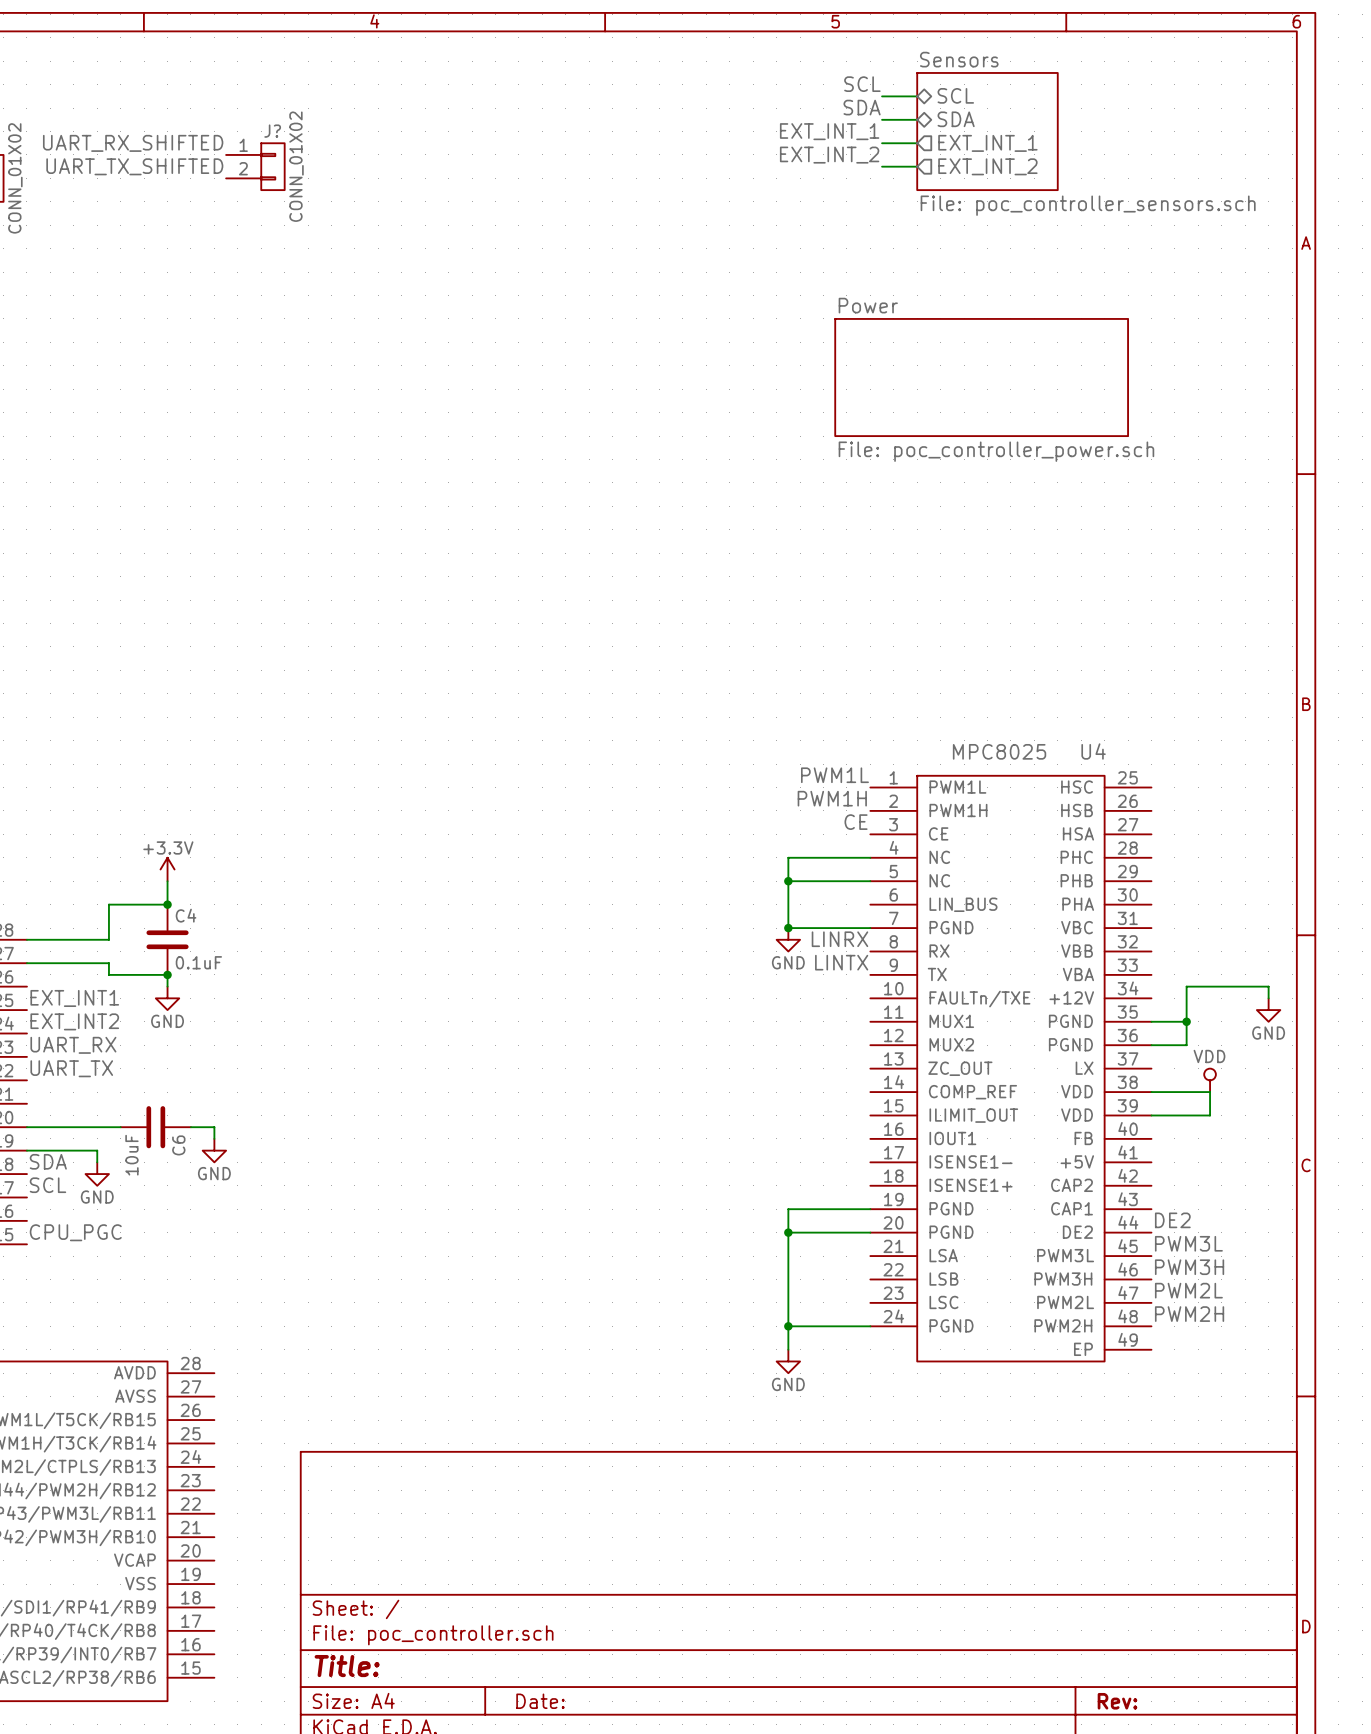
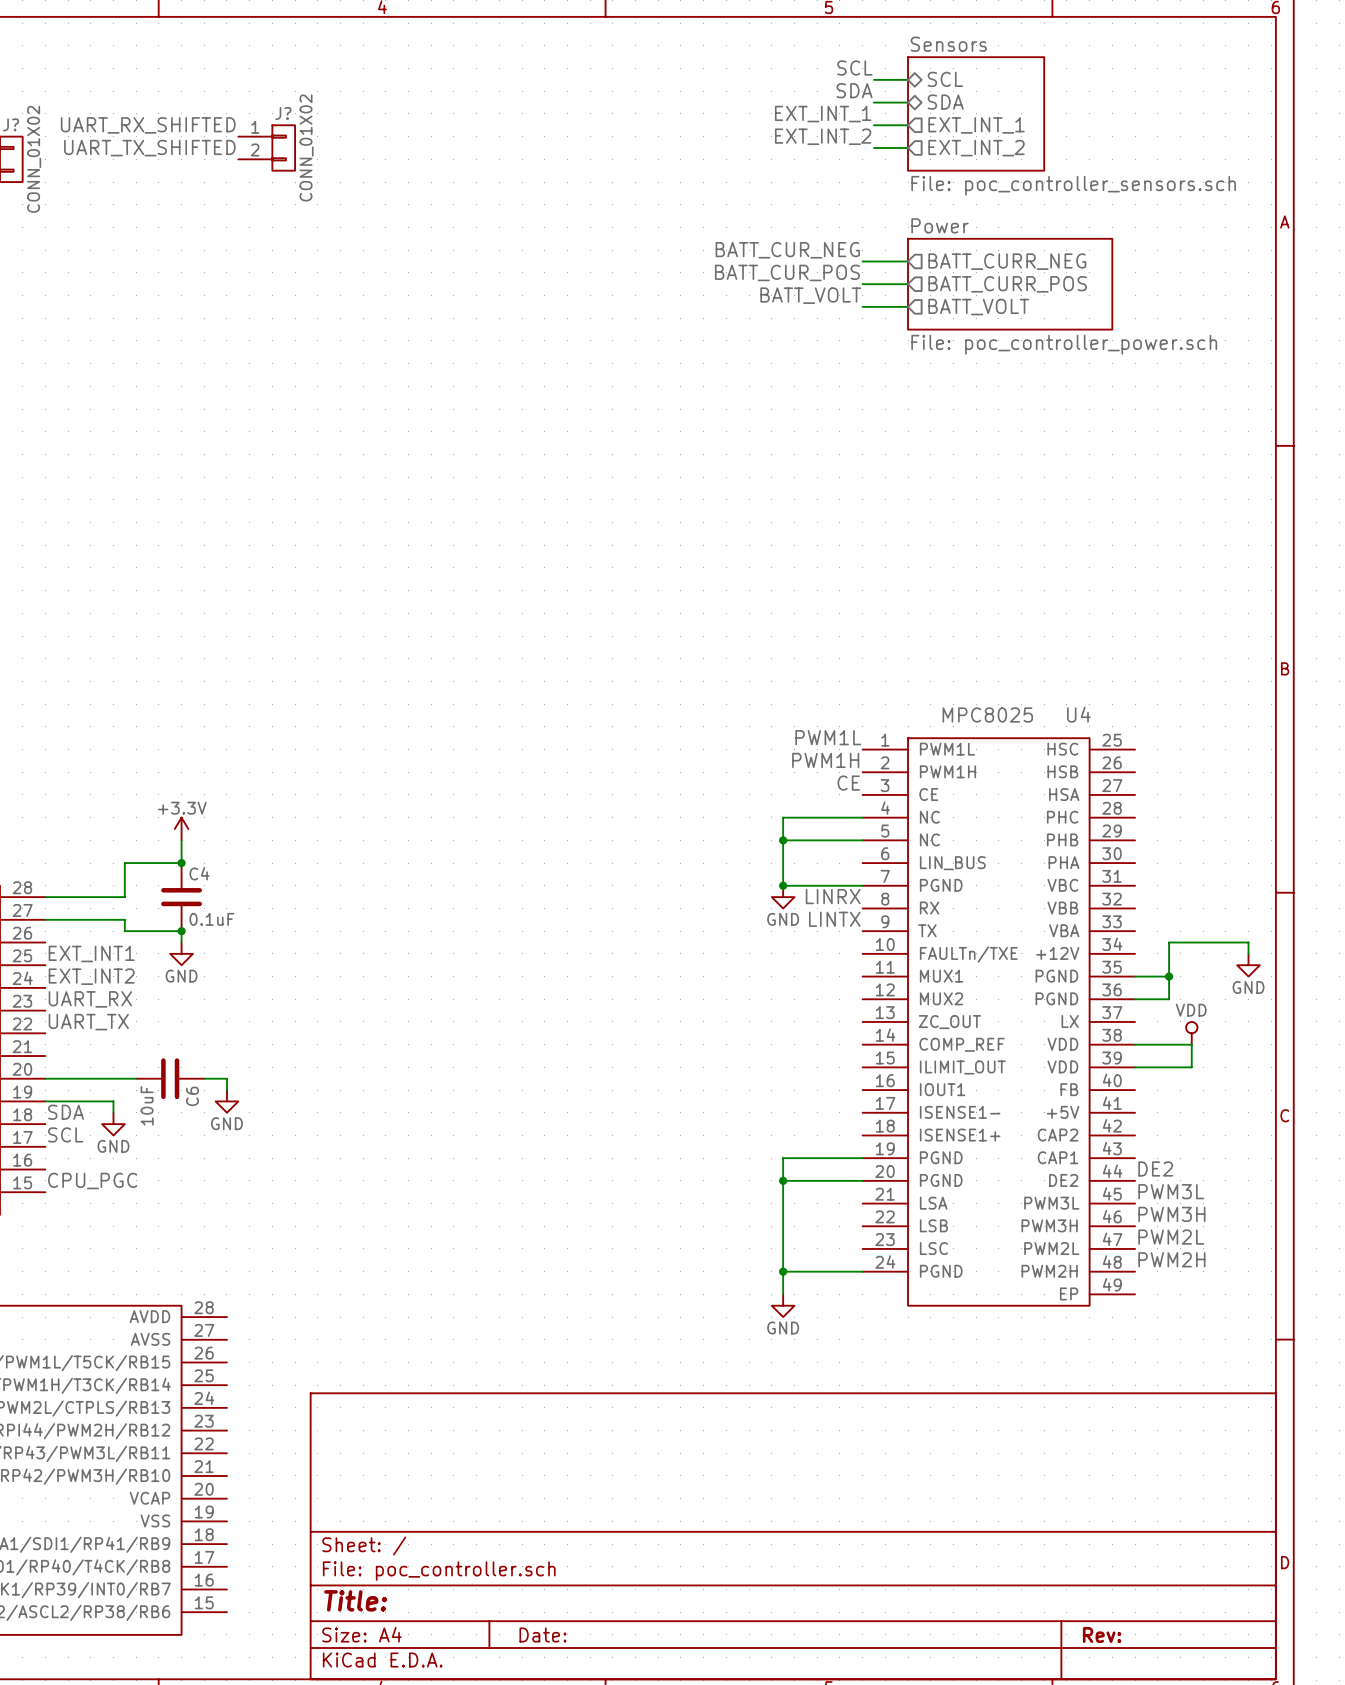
label: none -> BATT_CUR_NEG (787, 250)
wire: none -> (862, 261) (908, 261)
sheet pin: none -> BATT_CURR_NEG (1007, 261)
label: none -> BATT_CUR_POS (787, 272)
wire: none -> (862, 284) (908, 284)
sheet pin: none -> BATT_CURR_POS (1007, 284)
sheet Power: none -> File: poc_controller_power.sch (1010, 284)
label: none -> BATT_VOLT (810, 295)
wire: none -> (862, 306) (908, 306)
sheet pin: none -> BATT_VOLT (978, 307)
sheet Power: File: poc_controller_power.sch (981, 377) -> none

